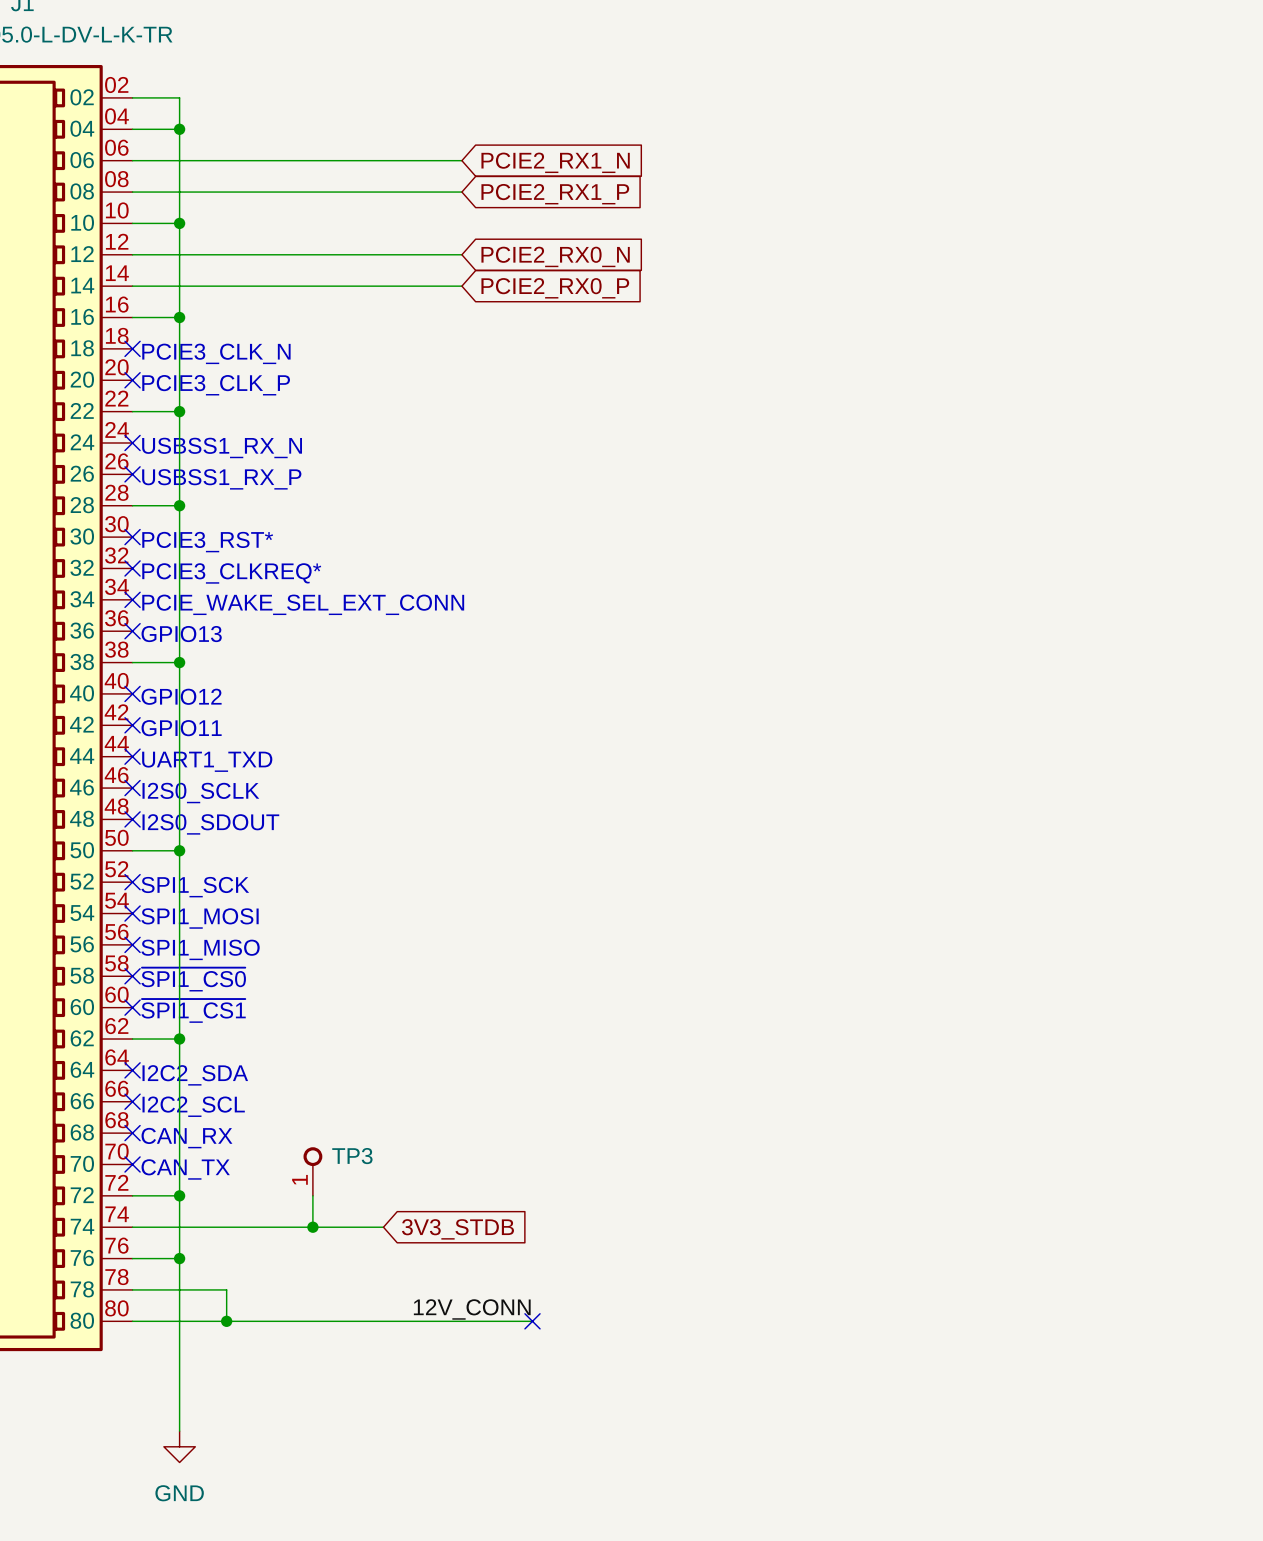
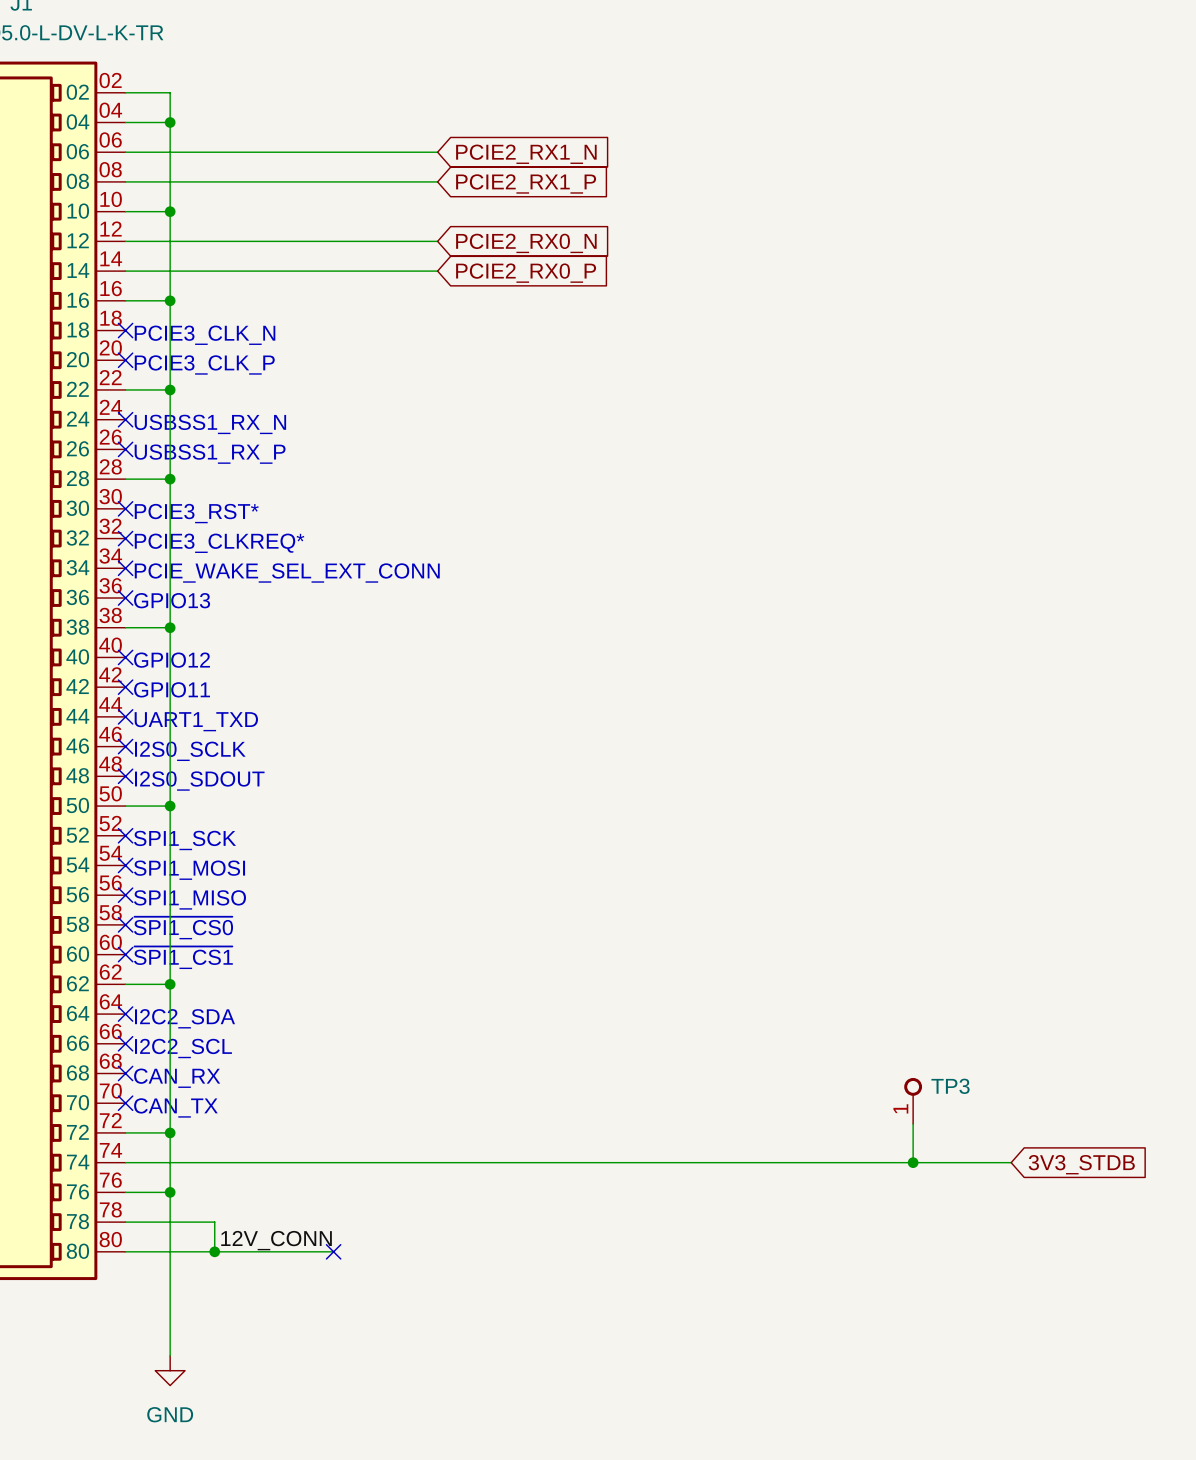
TP3 position: (312, 1171) -> (913, 1101)
wire: none -> (913, 1124) (913, 1162)
wire: (312, 1195) (312, 1227) -> none
junction: (312, 1227) -> none
wire: none -> (363, 1162) (1011, 1162)
junction: none -> (913, 1162)
global label: 3V3_STDB (458, 1229) -> none
global label: none -> 3V3_STDB (1081, 1164)
label position: 12V_CONN (472, 1309) -> 12V_CONN (276, 1240)
wire: (352, 1321) (532, 1321) -> none
no-connect mark: none -> (333, 1251)
no-connect mark: (532, 1321) -> none

